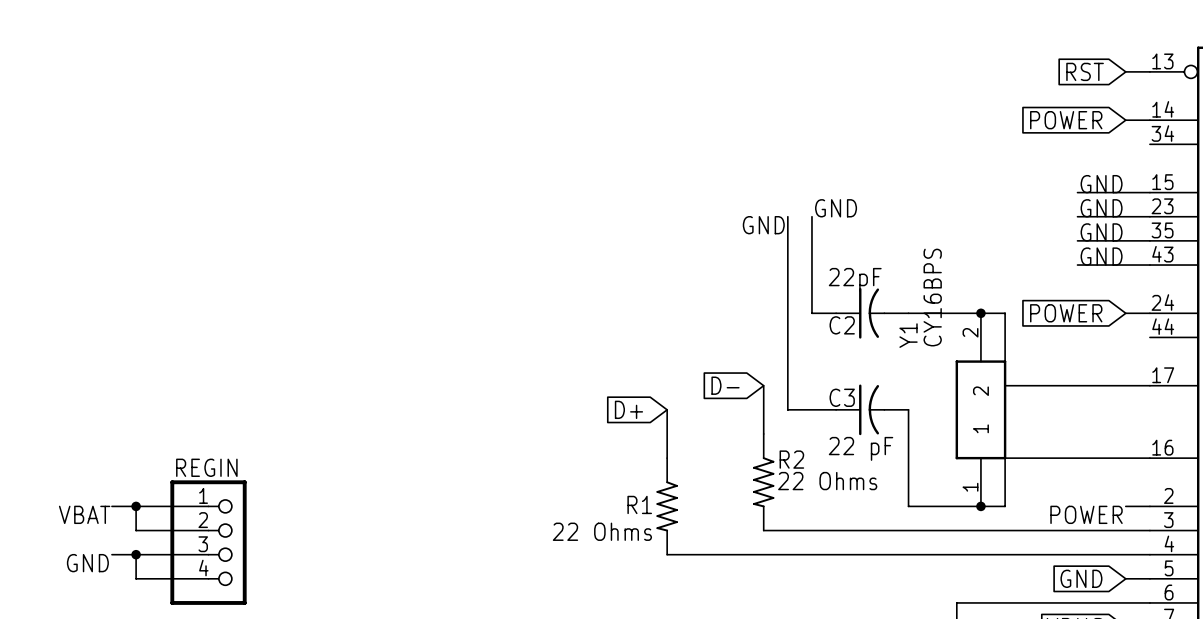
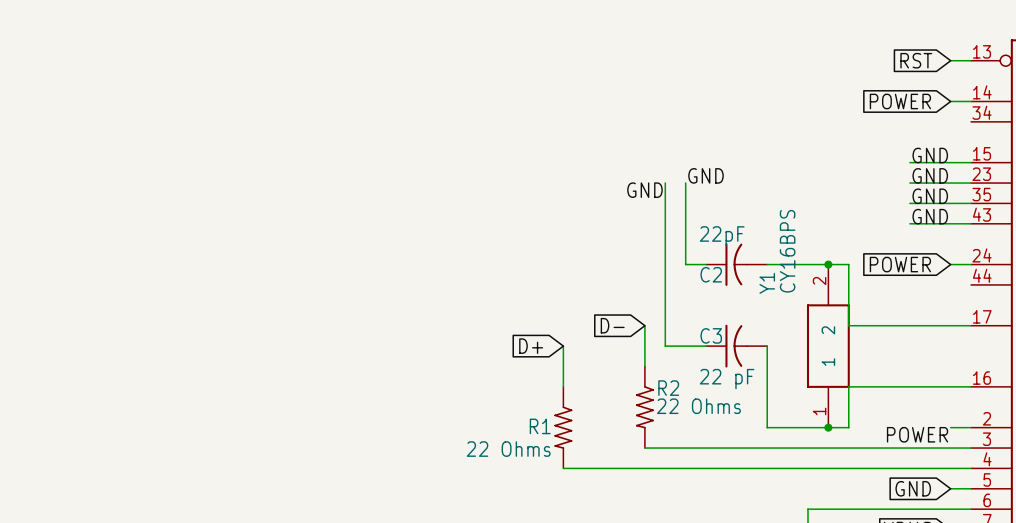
wire: (111, 506) (208, 506) -> none
wire: (136, 506) (136, 530) (208, 530) -> none
junction: (136, 506) -> none
label: VBAT (84, 514) -> none
REGIN: (208, 542) -> none
wire: (111, 554) (208, 554) -> none
wire: (136, 554) (136, 578) (208, 578) -> none
junction: (136, 554) -> none
label: GND (87, 563) -> none

